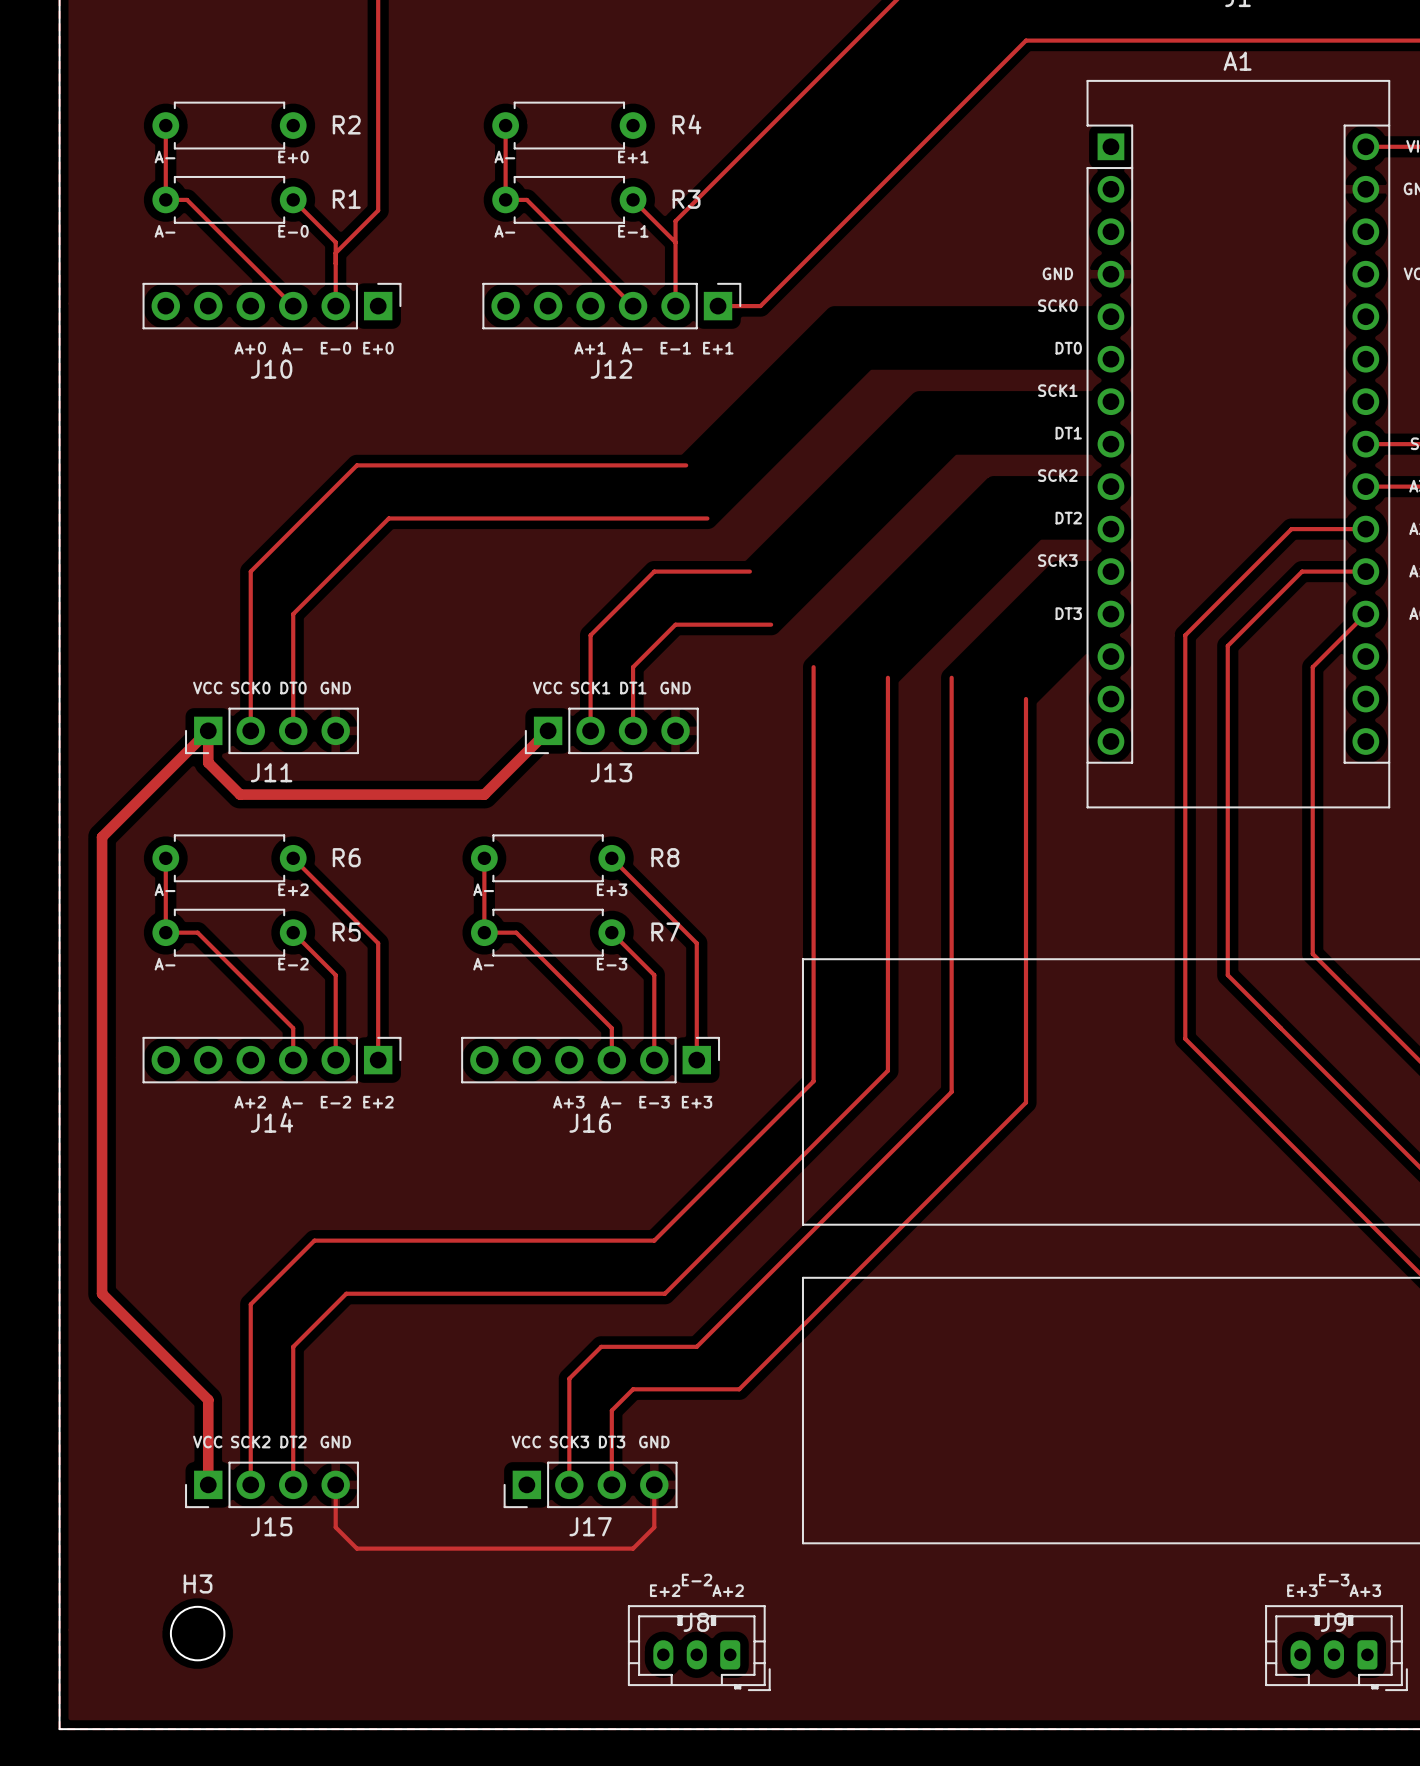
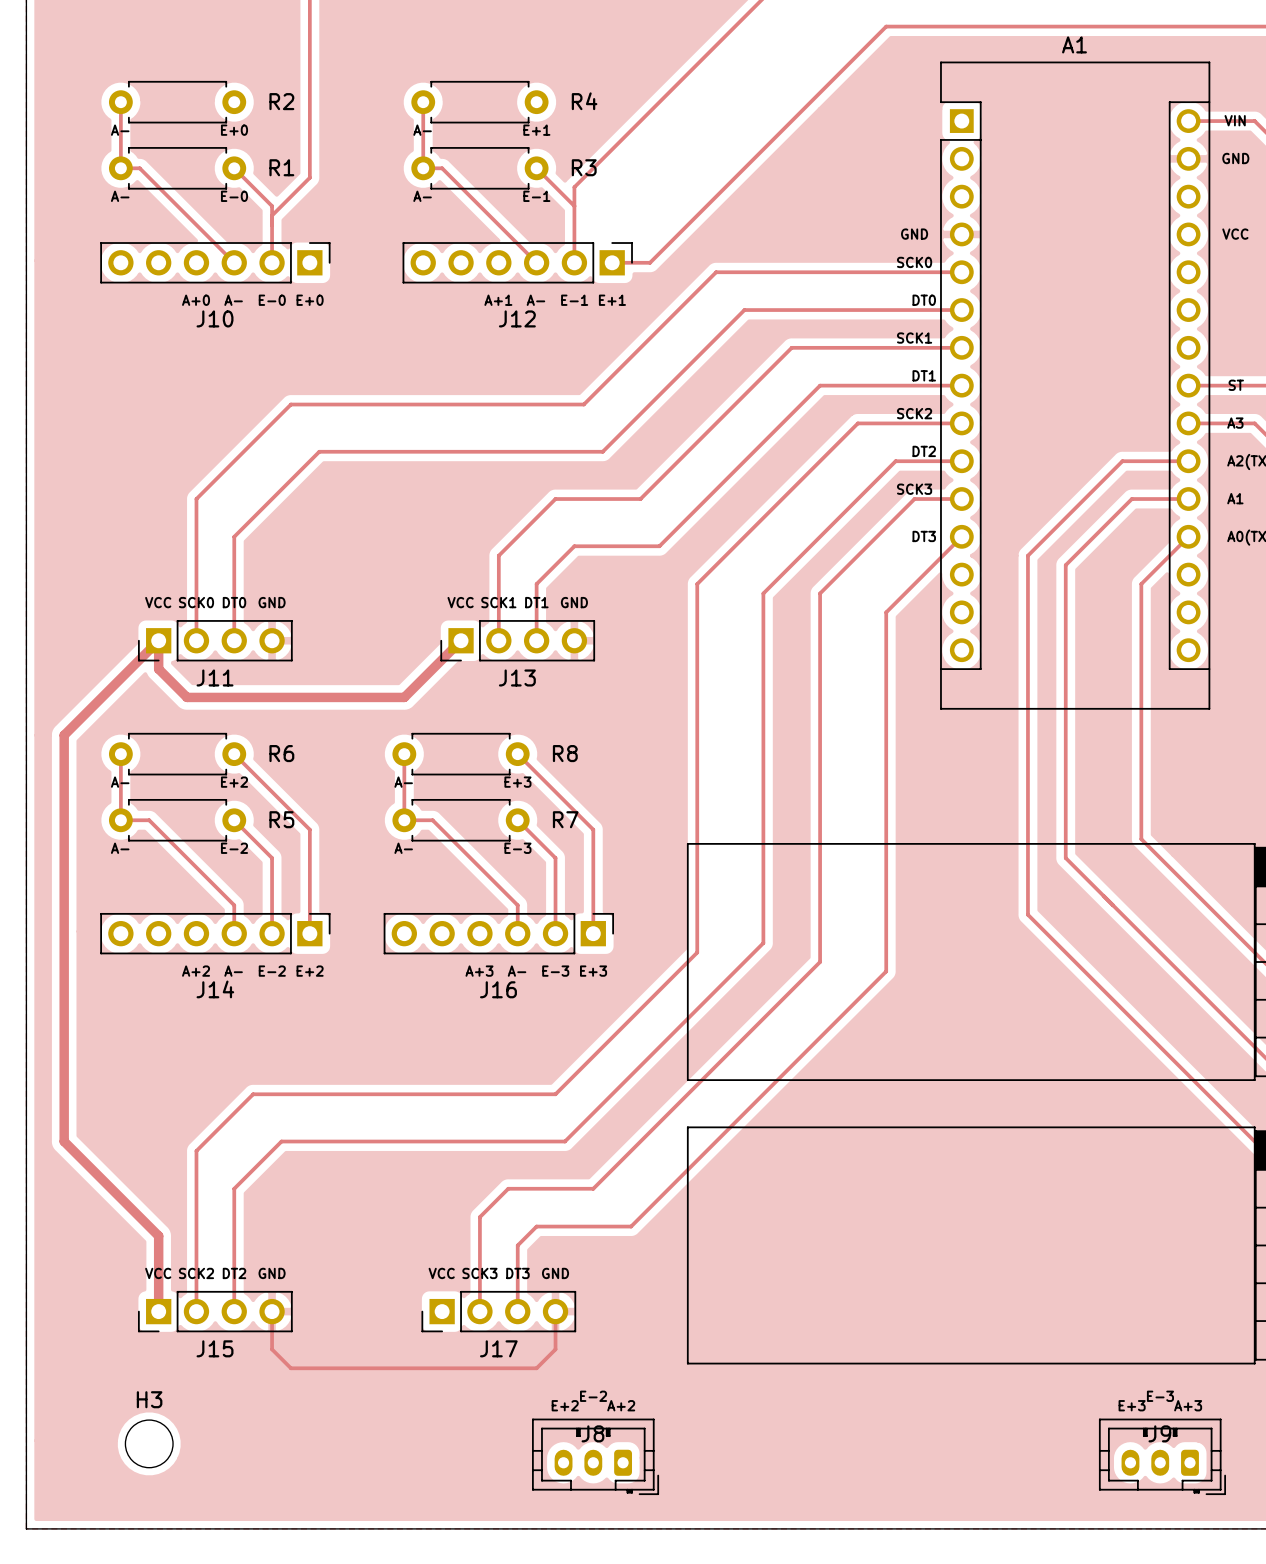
track: none -> (961, 272) (716, 272) (583, 404)
track: none -> (961, 310) (744, 310) (602, 451)
track: none -> (961, 347) (791, 347) (640, 499)
track: none -> (961, 385) (820, 385) (659, 546)
track: none -> (961, 423) (857, 423) (697, 584)
track: none -> (961, 461) (895, 461) (763, 593)
track: none -> (961, 499) (914, 499) (820, 593)
track: none -> (961, 536) (886, 612)

